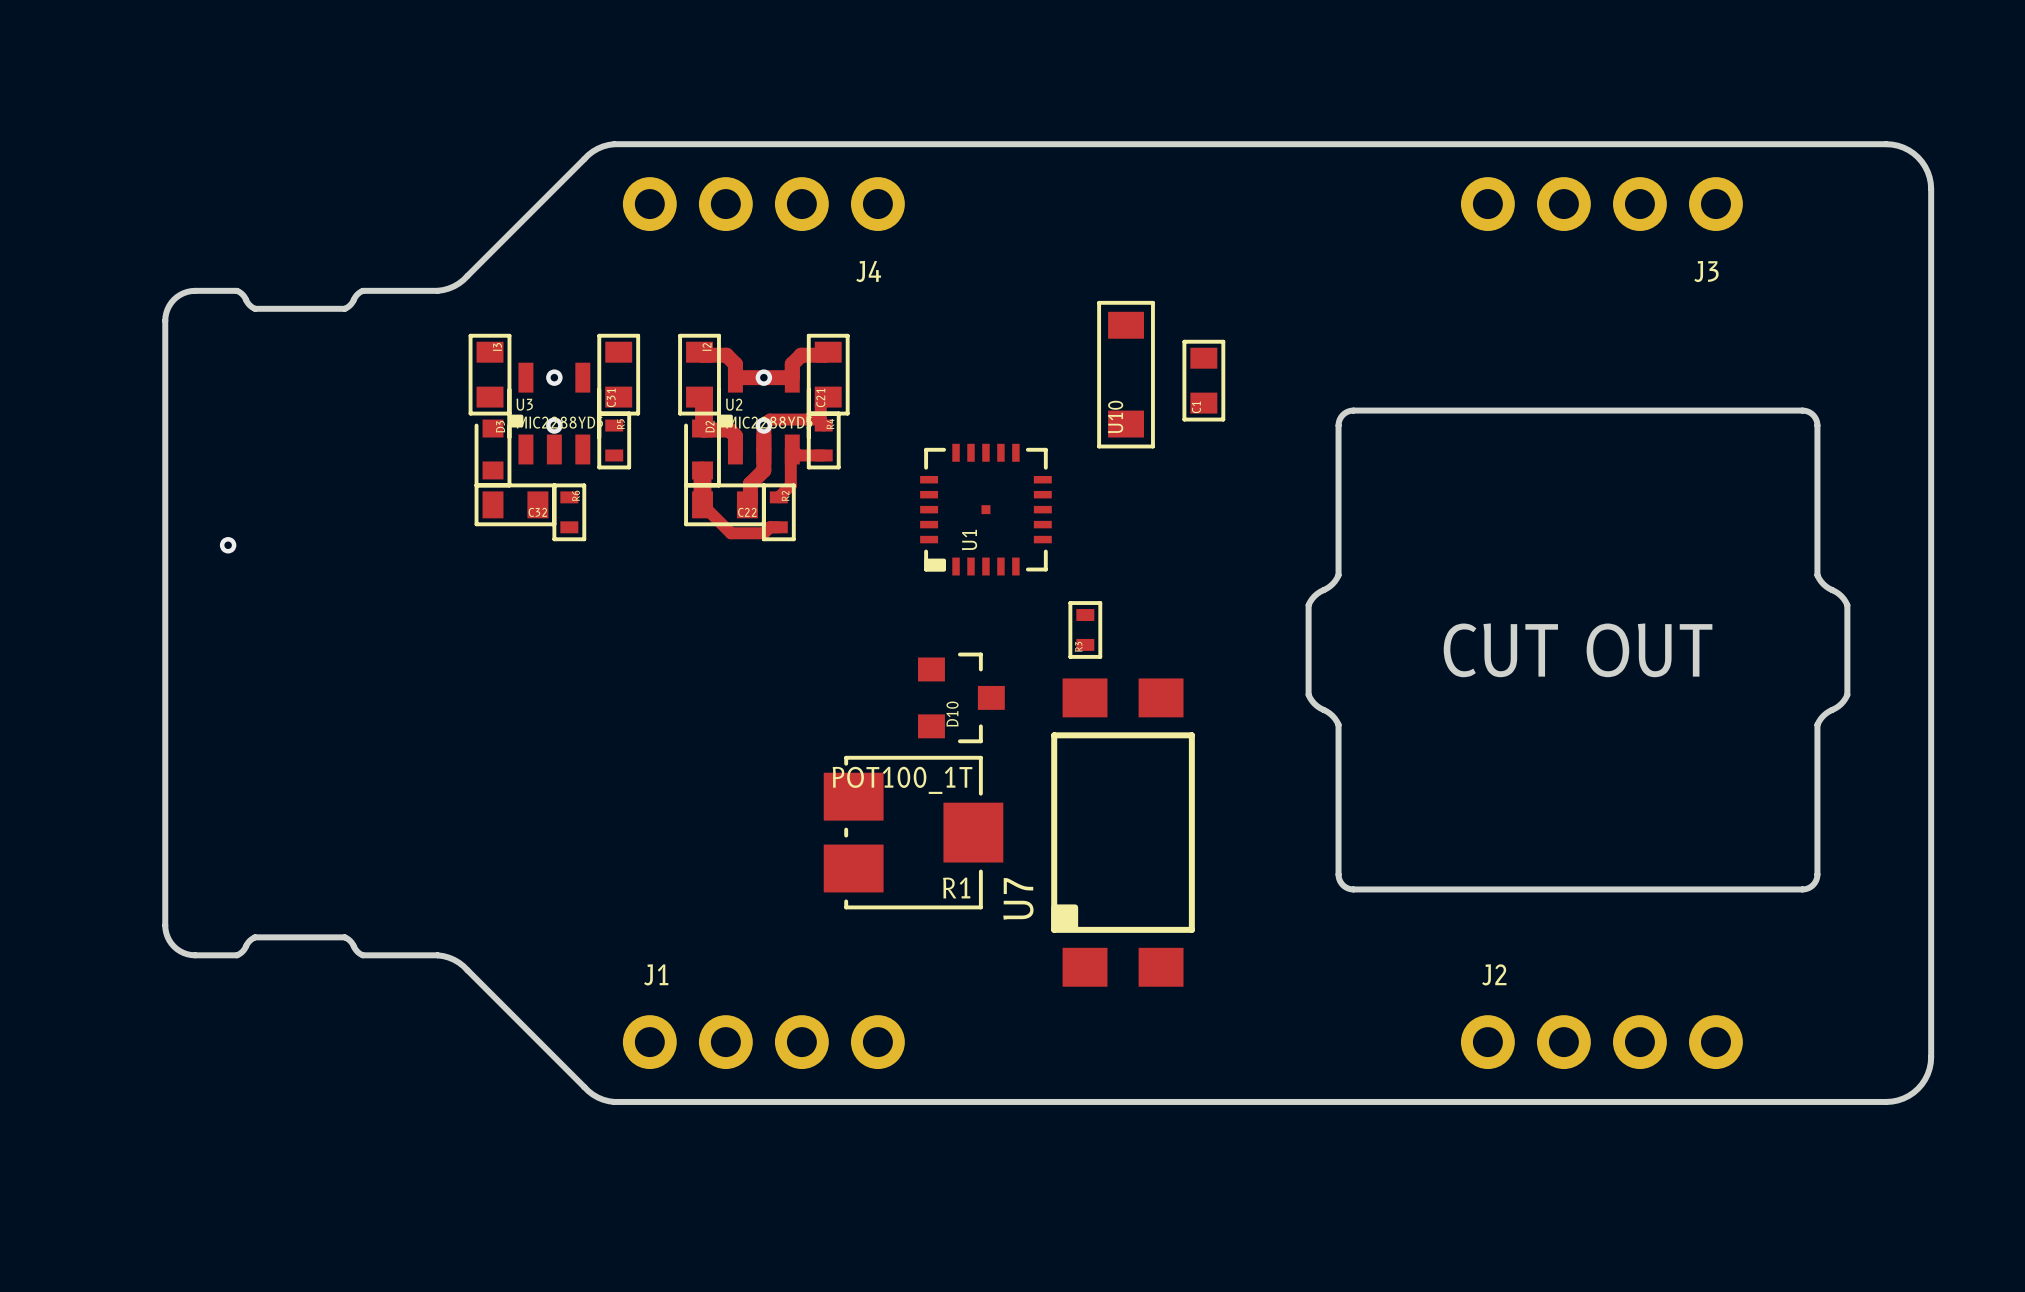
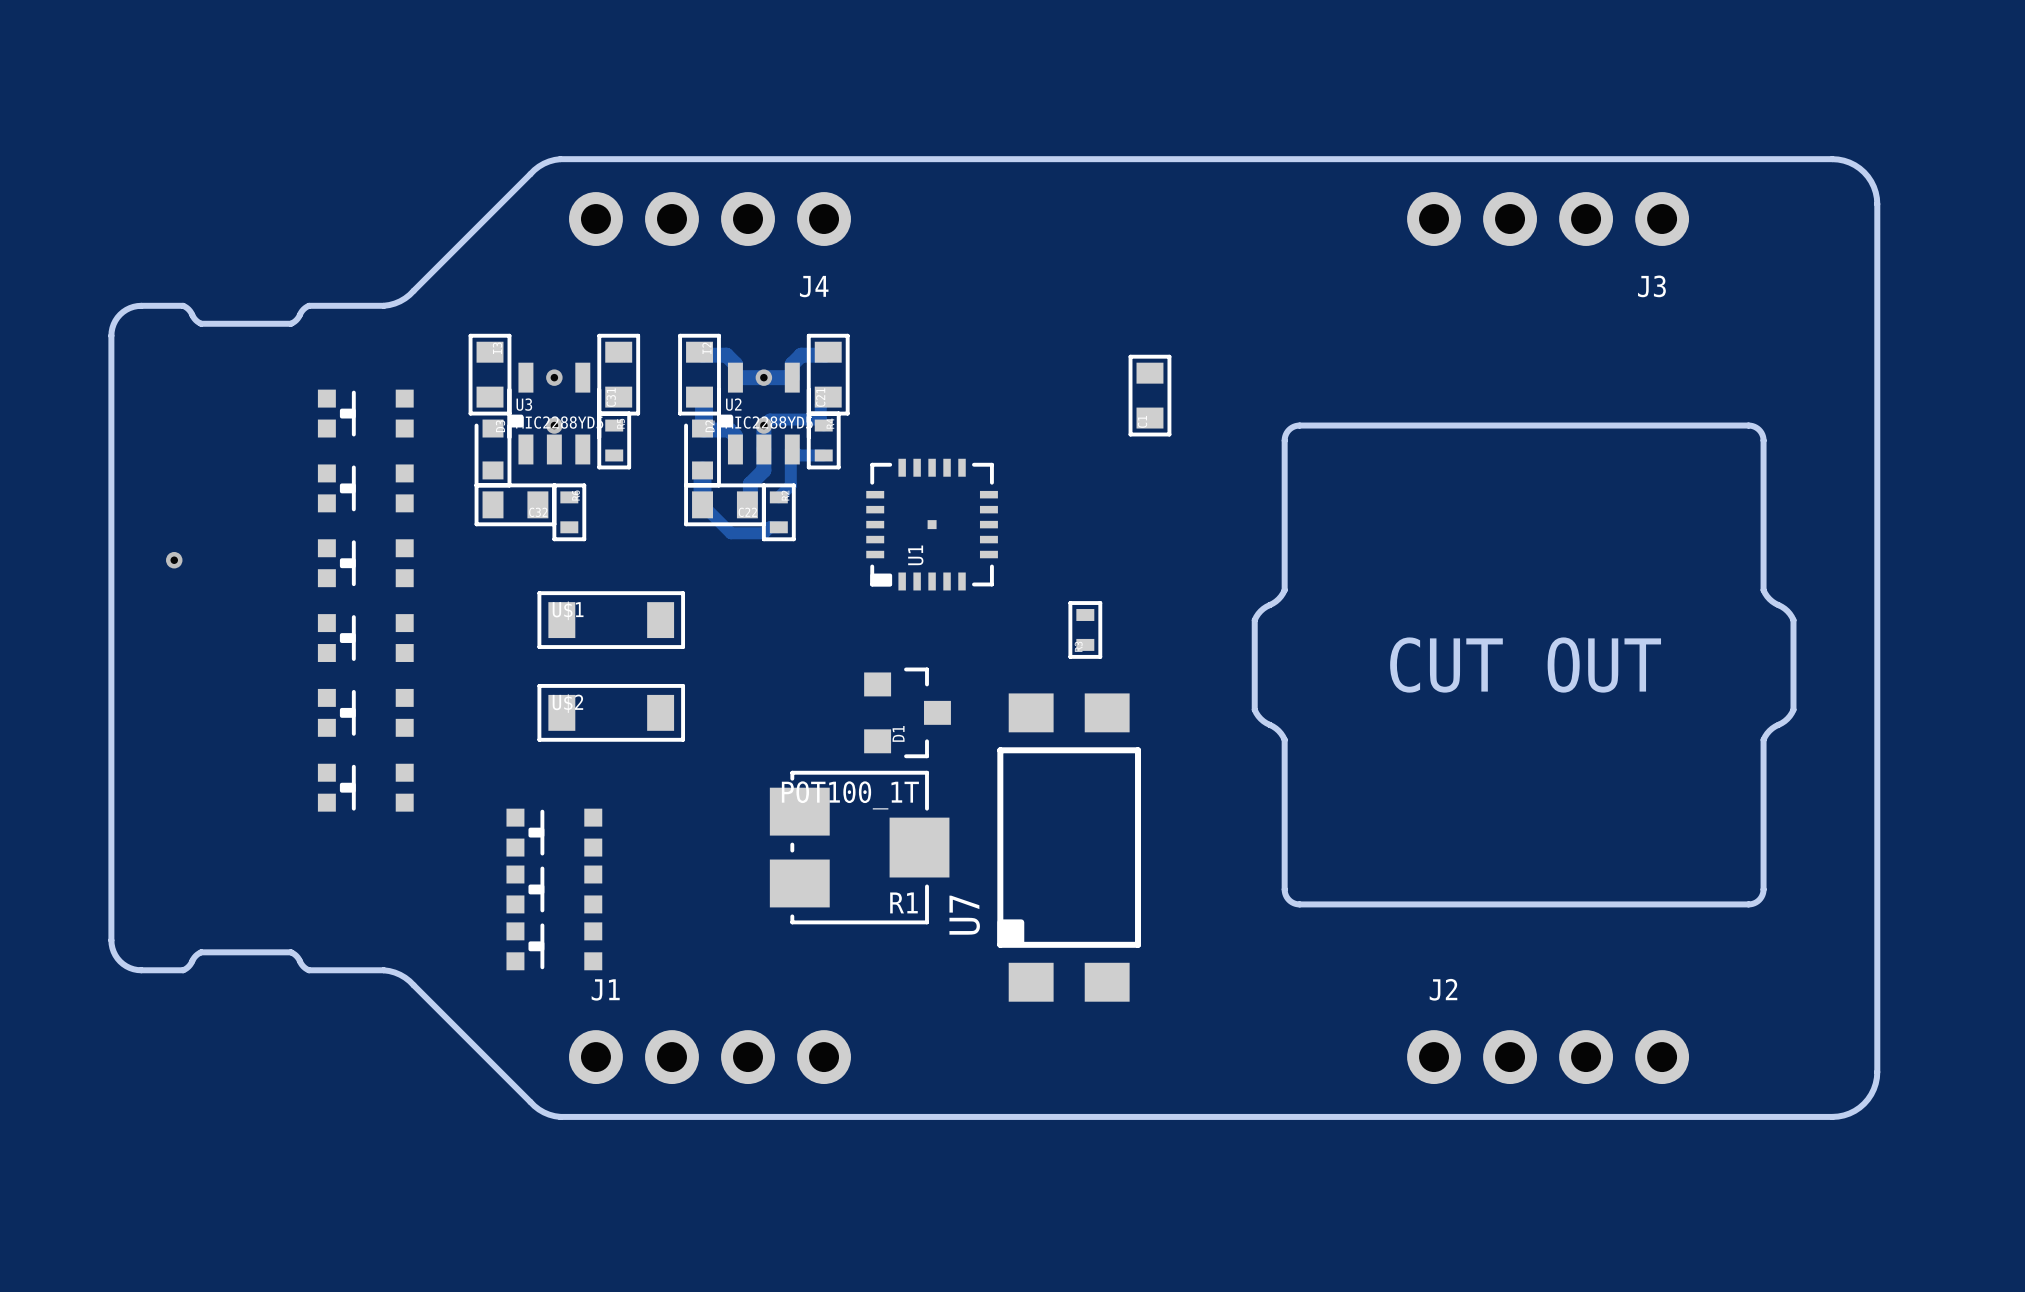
board edge: (614, 144) (1886, 144) (1897, 145) (1913, 153) (1925, 166) (1929, 177) (1931, 189) (1931, 1057) (1929, 1068) (1921, 1084) (1908, 1095) (1897, 1100) (1886, 1101) (614, 1101) (597, 1097) (588, 1091) (463, 966) (448, 957) (437, 955) (362, 955) (344, 937) (255, 937) (237, 955) (191, 955) (176, 949) (167, 936) (165, 925) (165, 320) (169, 305) (176, 297) (187, 291) (237, 290) (255, 308) (344, 308) (362, 290) (437, 290) (448, 288) (463, 279) (588, 155) (597, 148) (614, 144) -> (560, 159) (1832, 159) (1844, 160) (1859, 168) (1871, 181) (1875, 192) (1877, 204) (1877, 1072) (1875, 1083) (1868, 1099) (1854, 1110) (1844, 1115) (1832, 1116) (560, 1116) (543, 1112) (534, 1106) (409, 981) (394, 972) (383, 970) (308, 970) (290, 952) (201, 952) (183, 970) (137, 970) (123, 964) (113, 951) (111, 940) (111, 335) (115, 320) (123, 312) (133, 306) (183, 305) (201, 323) (290, 323) (308, 305) (383, 305) (394, 303) (409, 294) (534, 170) (543, 163) (560, 159)
J4 position: (763, 204) -> (710, 219)
J3 position: (1601, 204) -> (1548, 219)
U10: (1126, 374) -> none
C1 position: (1203, 380) -> (1149, 395)
board edge: (1353, 410) (1802, 410) (1813, 414) (1817, 425) (1817, 575) (1823, 584) (1838, 593) (1847, 605) (1847, 694) (1838, 706) (1823, 715) (1817, 724) (1817, 874) (1813, 885) (1802, 889) (1353, 889) (1342, 885) (1338, 874) (1338, 724) (1329, 713) (1314, 703) (1308, 694) (1308, 605) (1314, 596) (1329, 586) (1338, 575) (1338, 423) (1342, 414) (1353, 410) -> (1299, 425) (1748, 425) (1759, 429) (1763, 440) (1763, 590) (1769, 599) (1784, 608) (1793, 620) (1793, 709) (1787, 718) (1772, 728) (1763, 739) (1763, 889) (1759, 900) (1748, 904) (1299, 904) (1289, 900) (1284, 889) (1284, 739) (1278, 730) (1263, 721) (1254, 709) (1254, 620) (1263, 608) (1278, 599) (1284, 590) (1284, 438) (1289, 429) (1299, 425)
part: none -> (365, 413)
part: none -> (365, 488)
U1 position: (985, 509) -> (932, 524)
via position: (228, 545) -> (174, 560)
part: none -> (365, 563)
part: none -> (611, 620)
part: none -> (365, 638)
text position: CUT OUT (1578, 650) -> CUT OUT (1525, 665)
D10: (961, 697) -> none
part: none -> (365, 712)
part: none -> (611, 712)
D1: none -> (907, 712)
part: none -> (365, 787)
part: none -> (554, 832)
R1 position: (913, 832) -> (859, 847)
U7 position: (1123, 832) -> (1069, 847)
part: none -> (554, 889)
part: none -> (554, 946)
J1 position: (763, 1042) -> (710, 1057)
J2 position: (1601, 1042) -> (1548, 1057)

